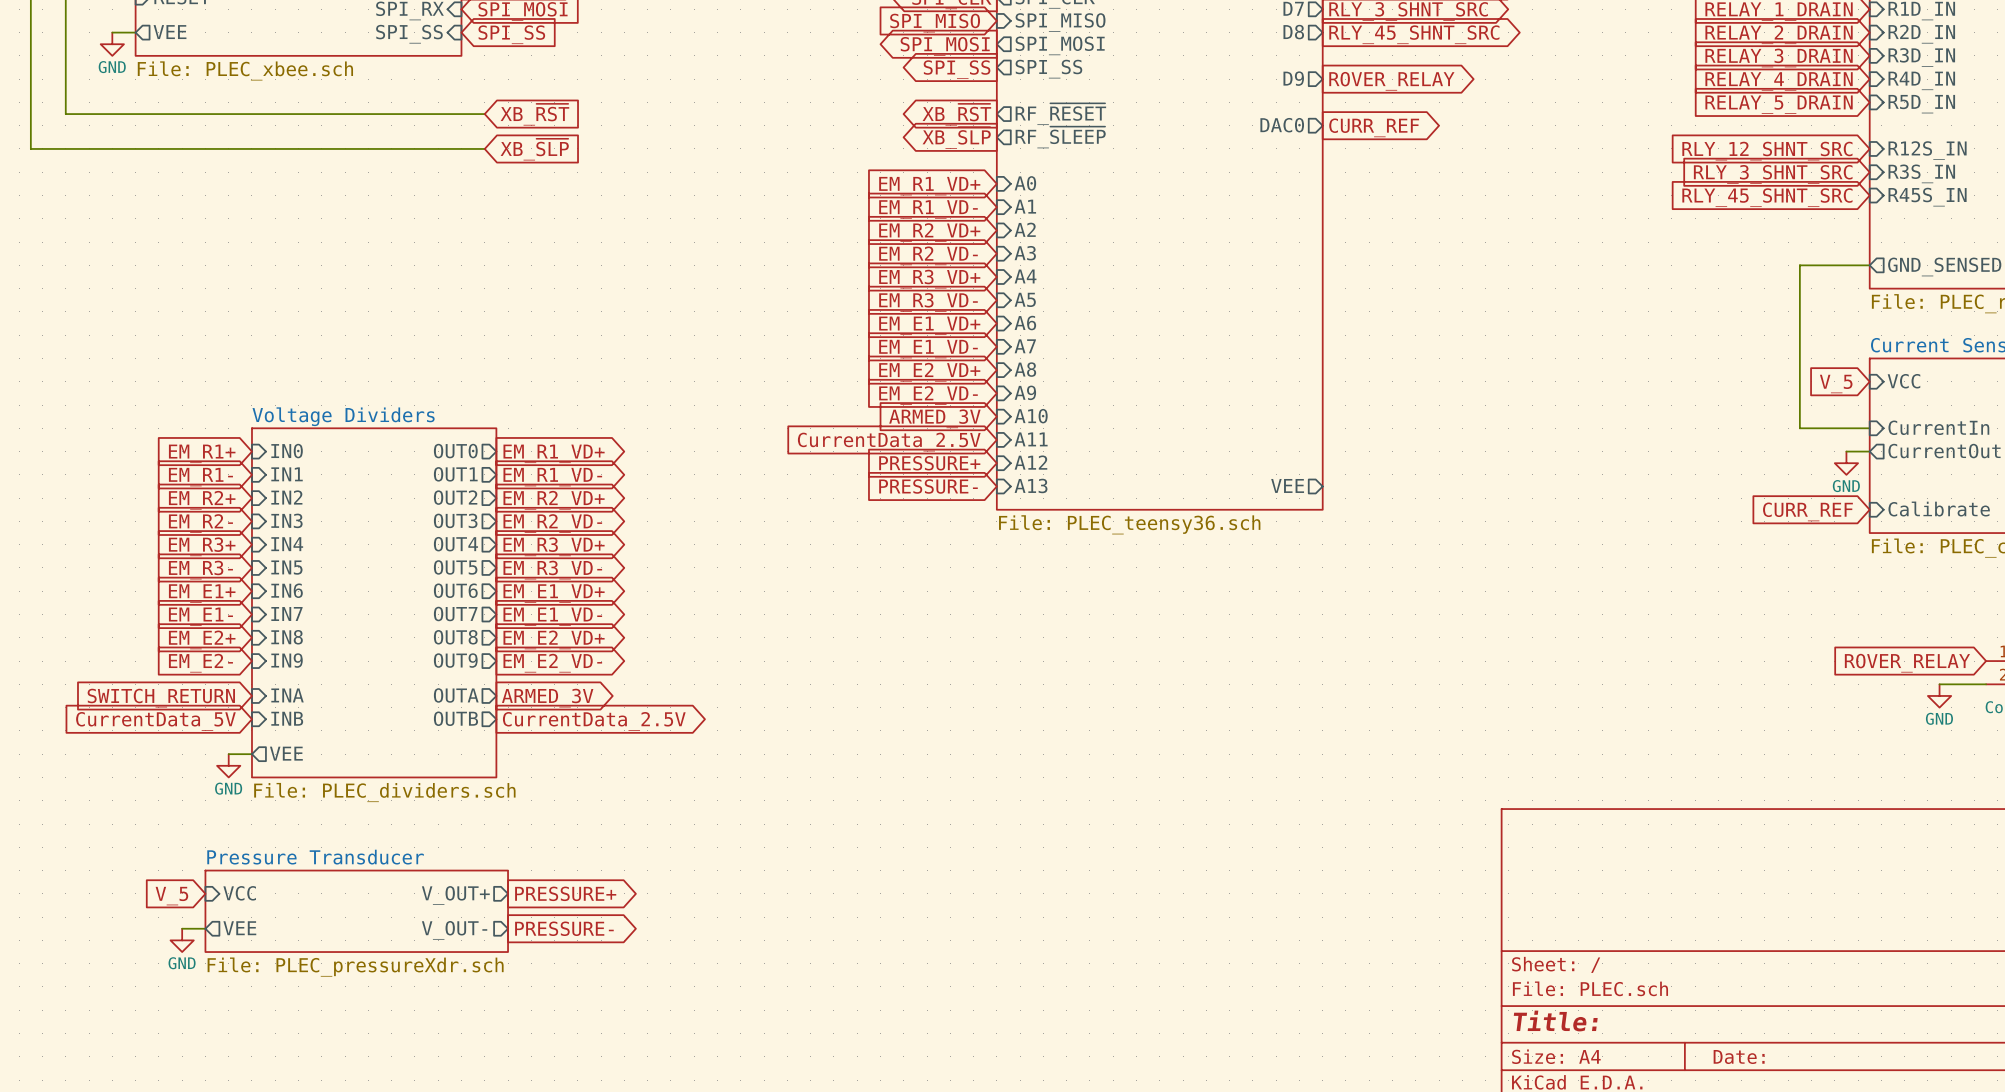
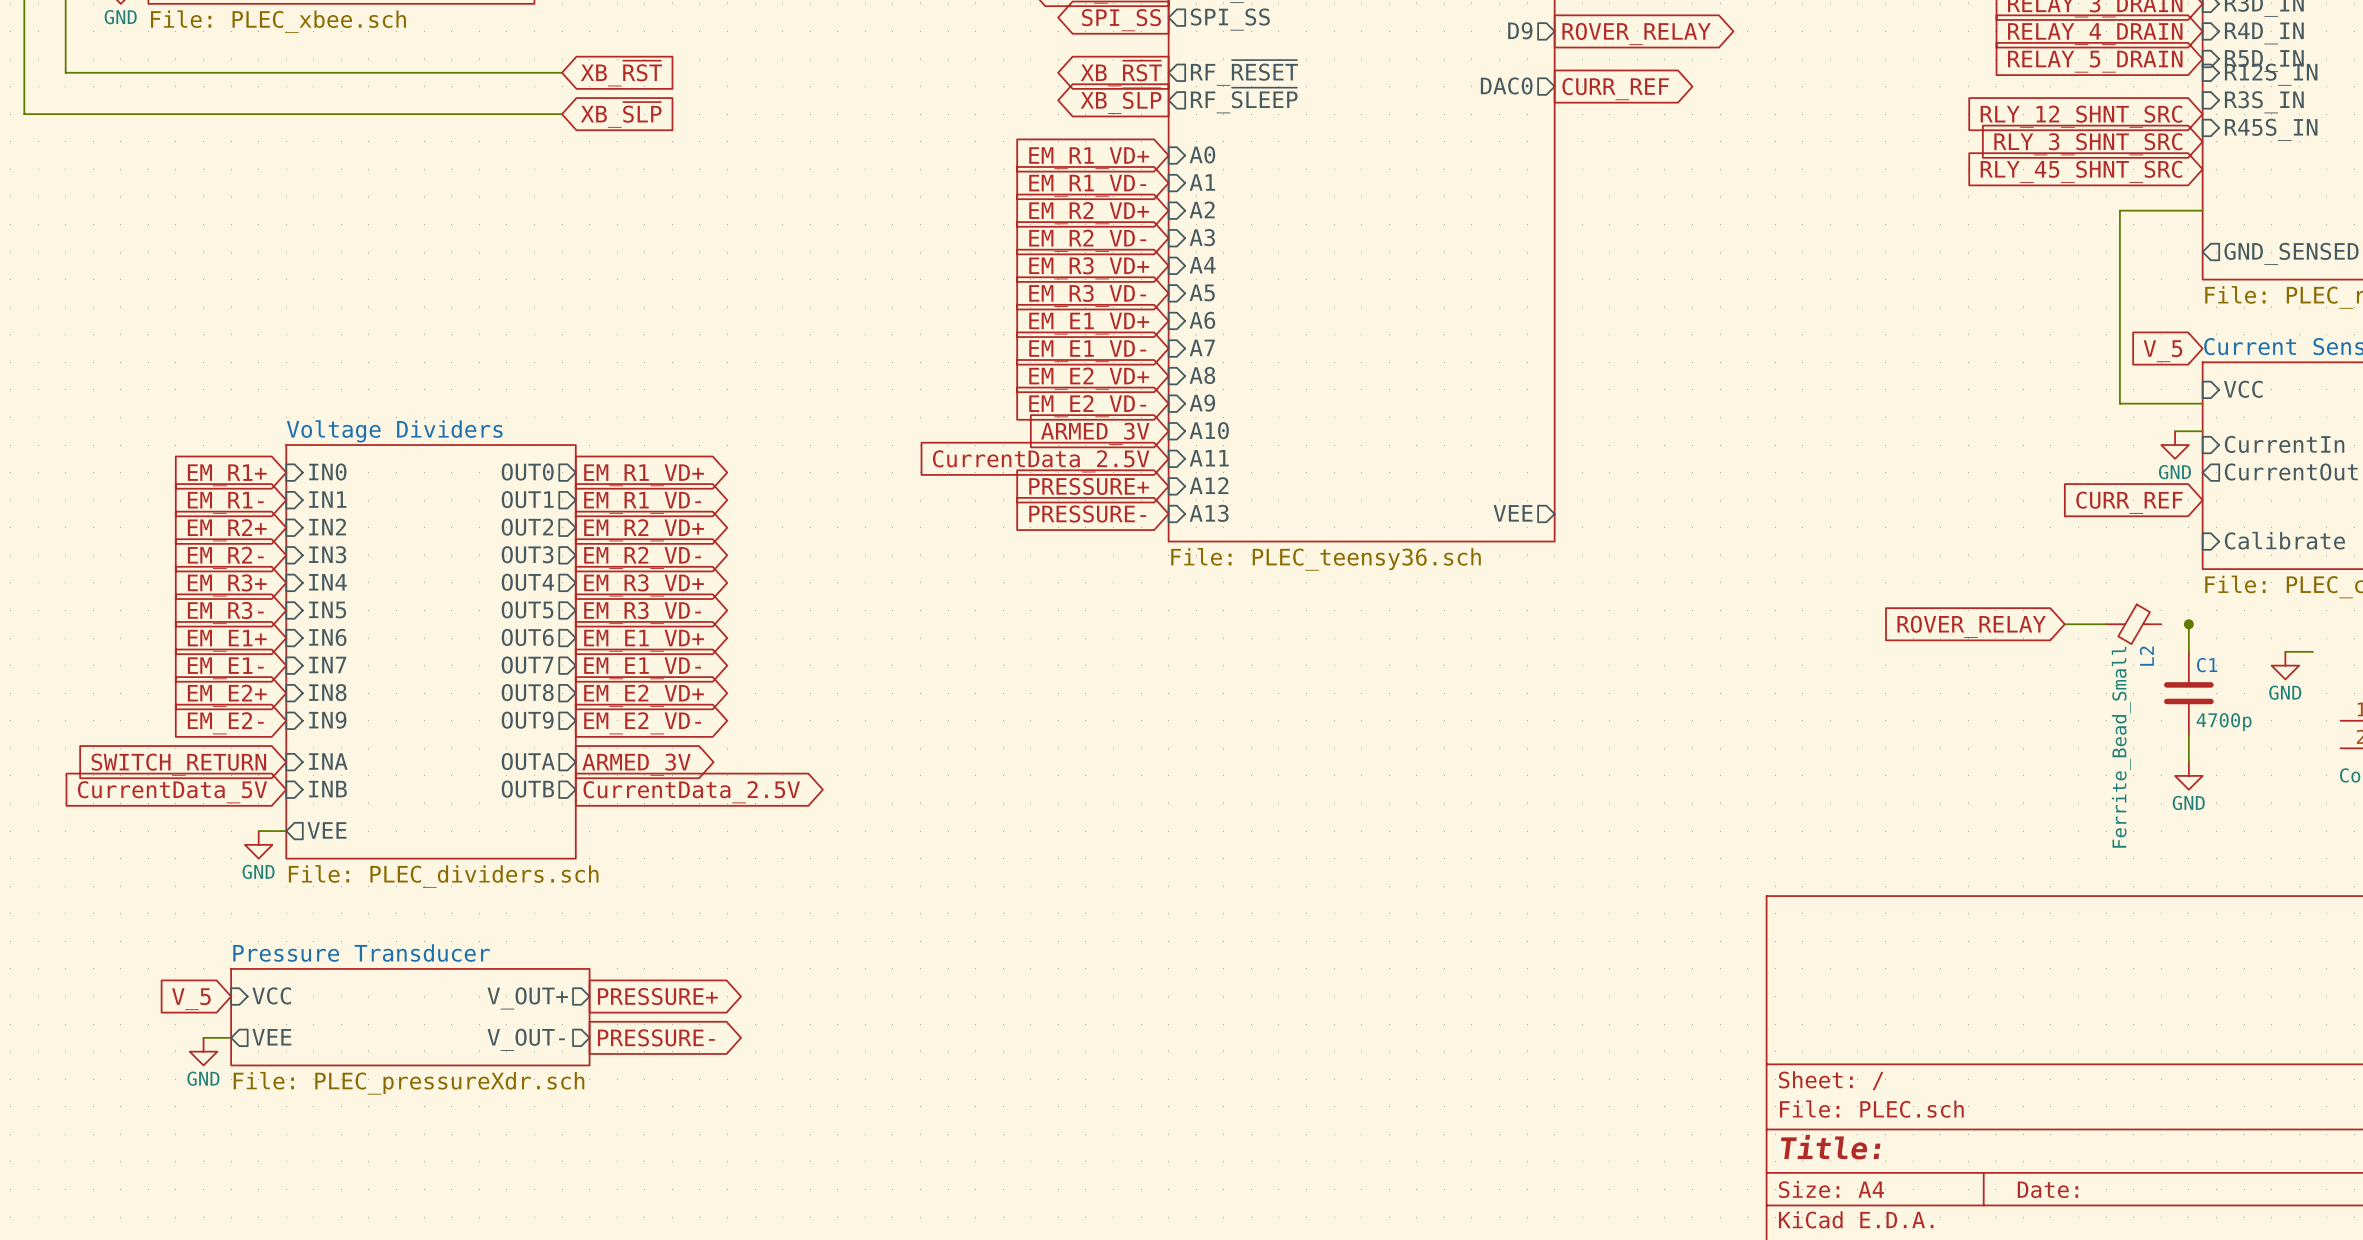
sheet pin position: R12S_IN (1927, 150) -> R12S_IN (2271, 74)
sheet pin position: R3S_IN (1921, 173) -> R3S_IN (2264, 102)
sheet pin position: R45S_IN (1927, 197) -> R45S_IN (2271, 129)
wire: (1799, 265) (1869, 265) -> (2119, 252) (2119, 210) (2202, 210)
global label position: V_5 (1836, 384) -> V_5 (2162, 351)
wire: (1799, 393) (1799, 428) (1869, 428) -> (2119, 403) (2202, 403)
wire: (1846, 451) (1869, 451) -> (2175, 431) (2202, 431)
power symbol position: GND (1846, 463) -> GND (2175, 445)
global label position: CURR_REF (1807, 511) -> CURR_REF (2129, 502)
wire: none -> (2064, 624) (2106, 624)
L2: none -> Ferrite_Bead_Small (2133, 624)
wire: none -> (2188, 624) (2188, 651)
junction: none -> (2188, 624)
global label: none -> ROVER_RELAY (1971, 626)
wire: none -> (2285, 651) (2312, 651)
power symbol: none -> GND (2285, 665)
C1: none -> 4700p (2188, 693)
global label: ROVER_RELAY (1907, 663) -> none
wire: none -> (2188, 734) (2188, 762)
wire: (1939, 684) (1986, 684) -> none
power symbol: GND (1939, 695) -> none
power symbol: none -> GND (2188, 775)

